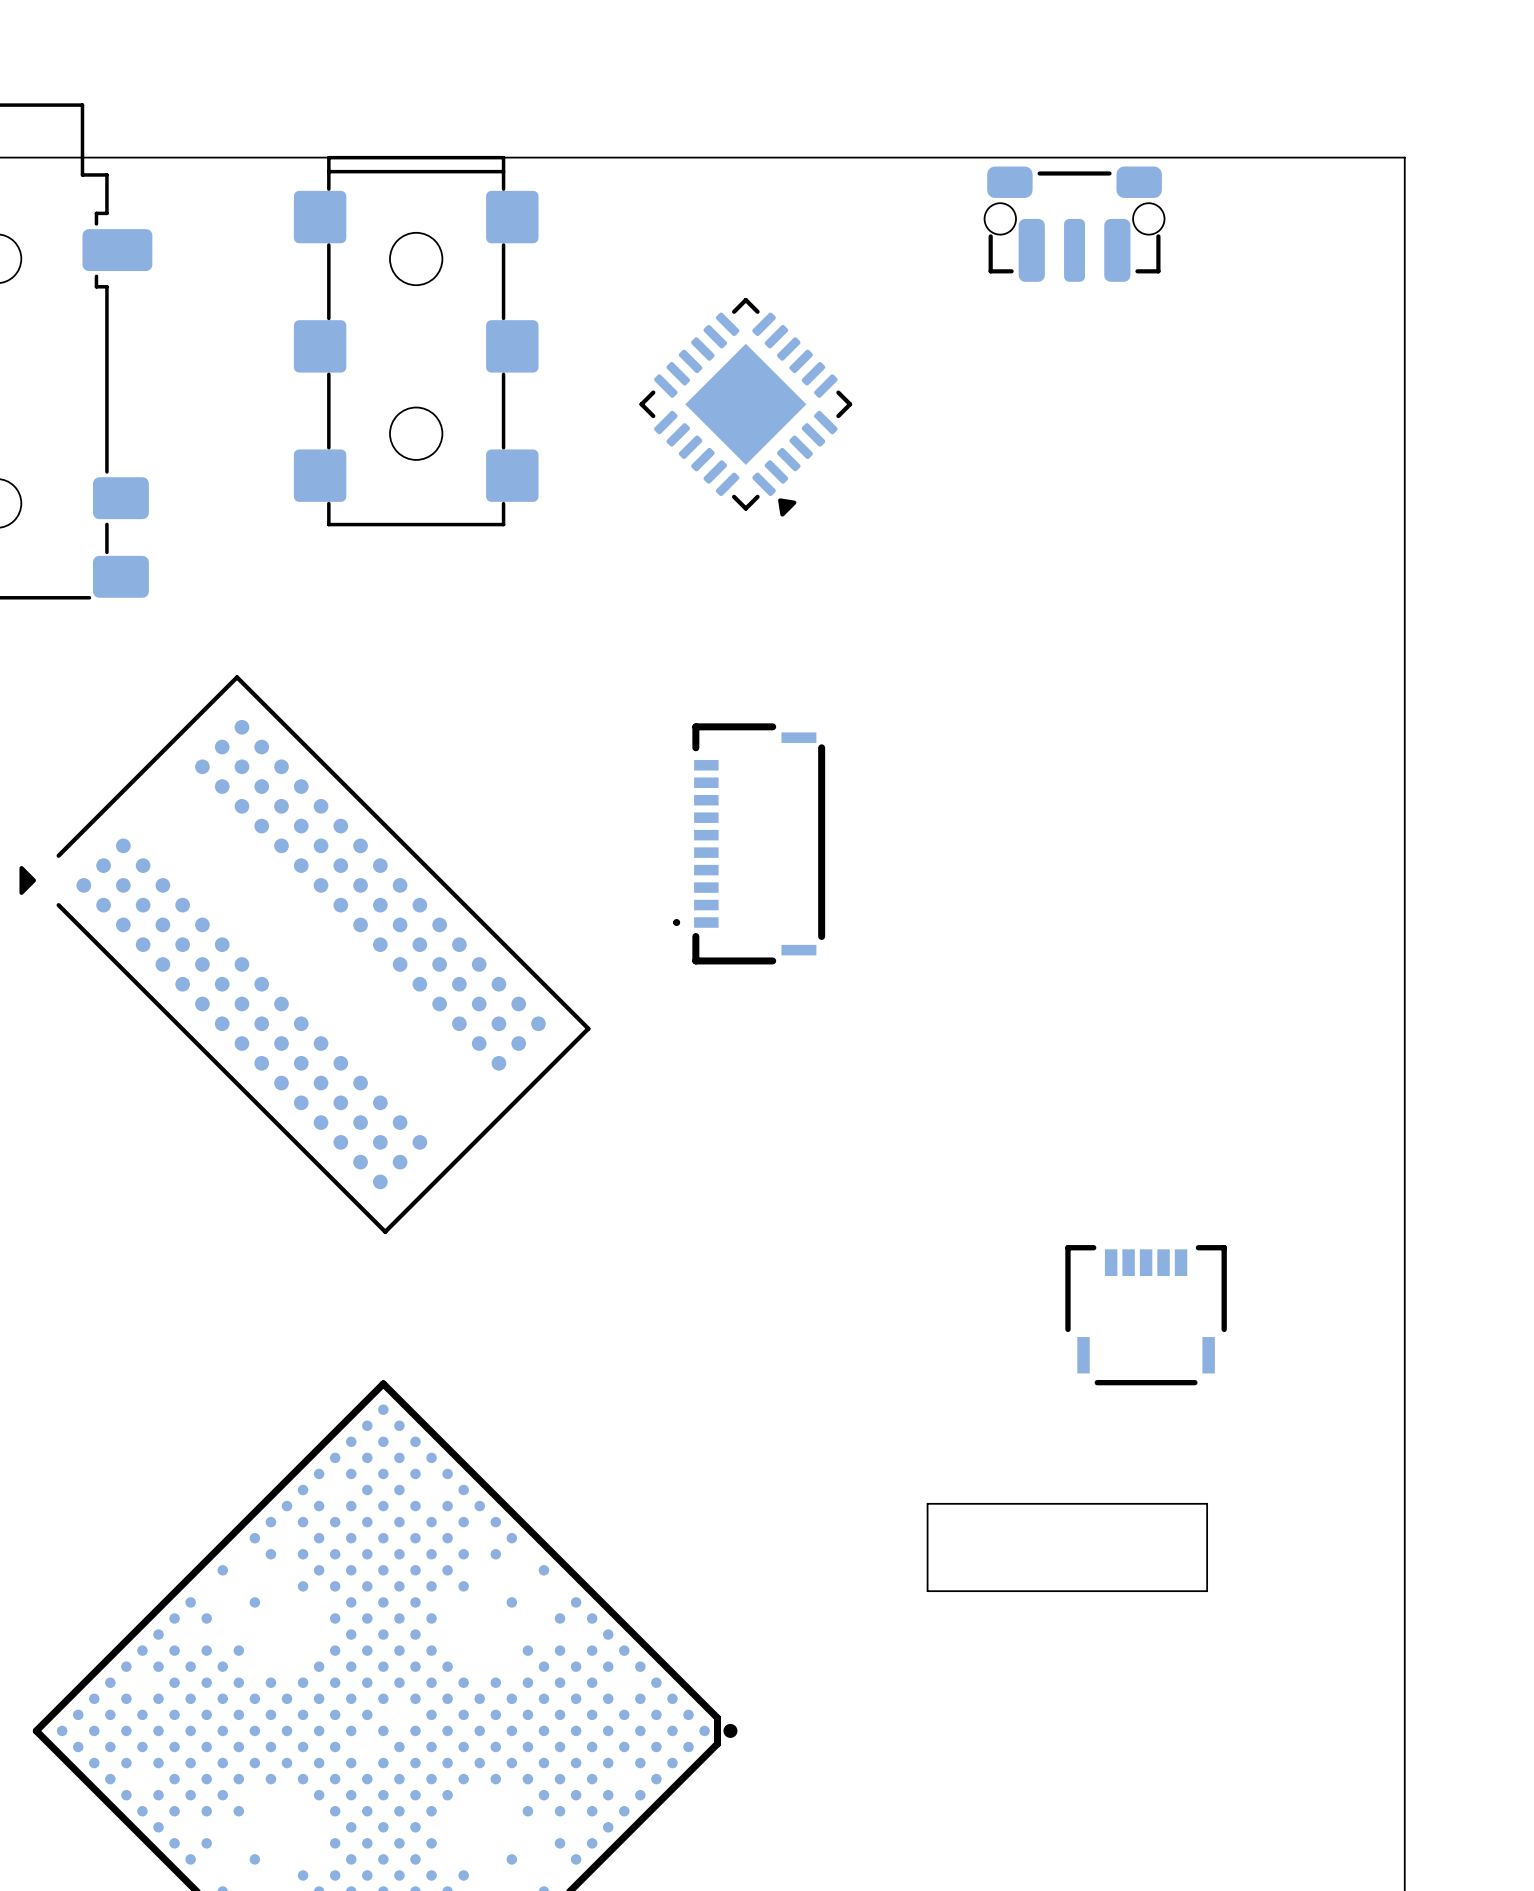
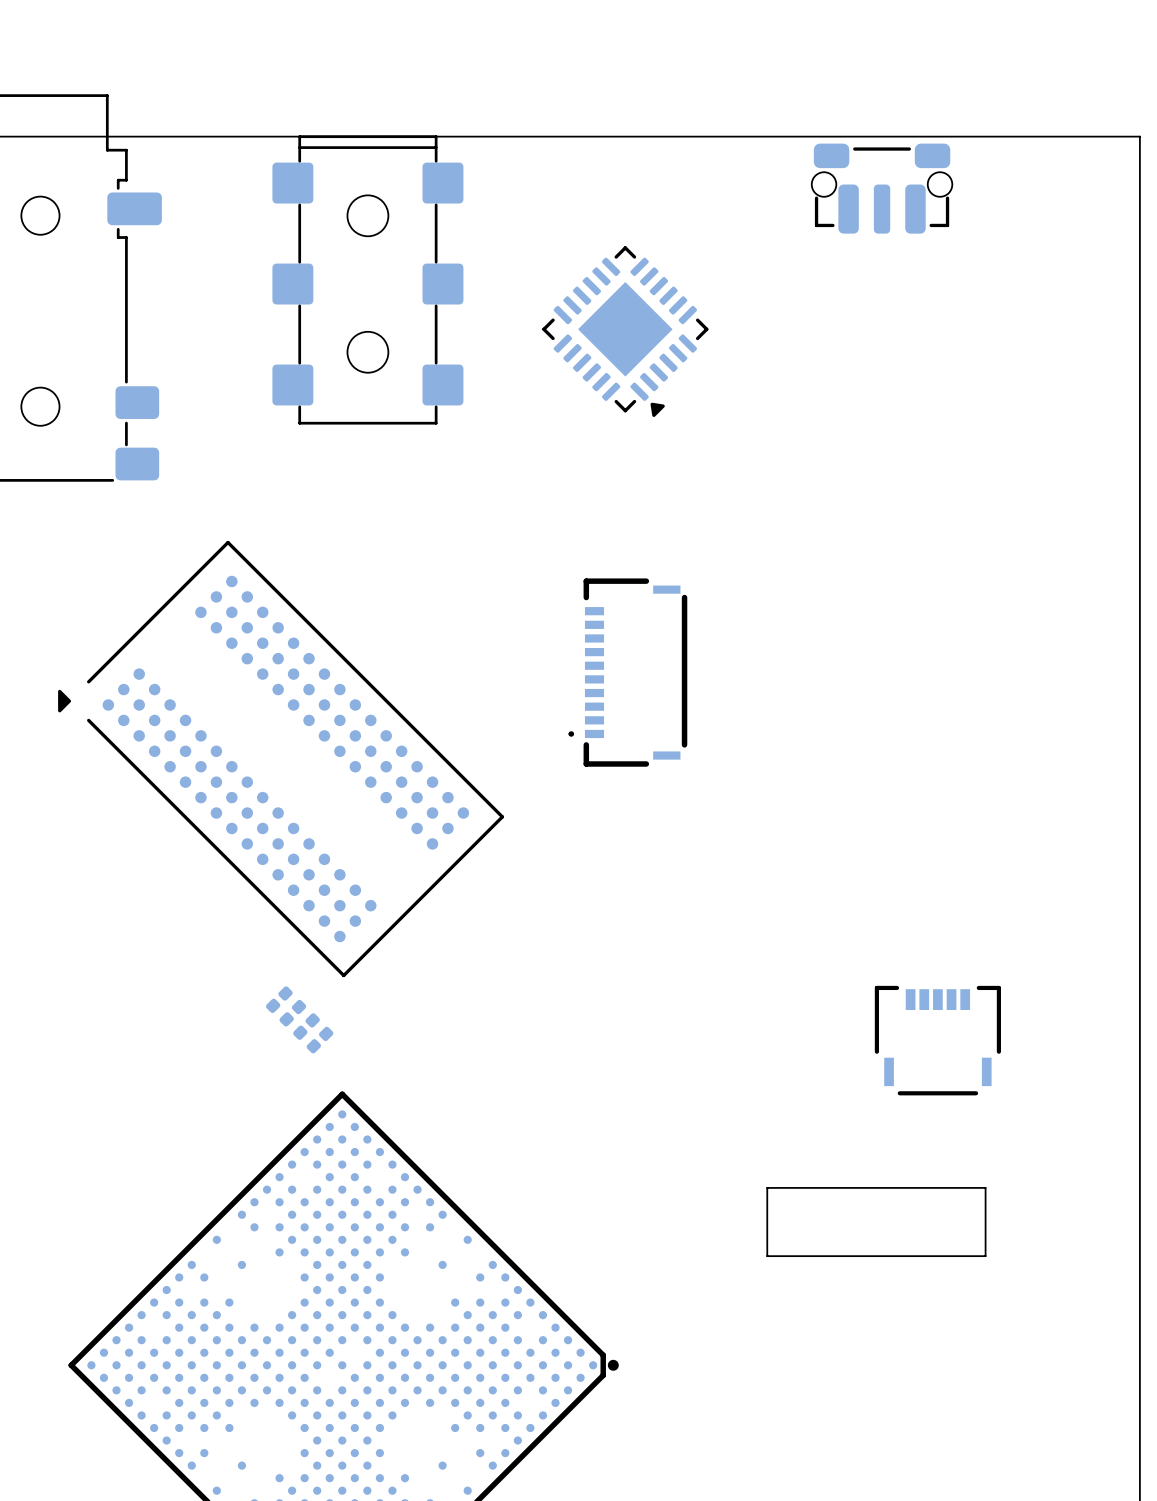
part: none -> (279, 999)
part: none -> (292, 1013)
part: none -> (306, 1026)
part: none -> (320, 1040)

